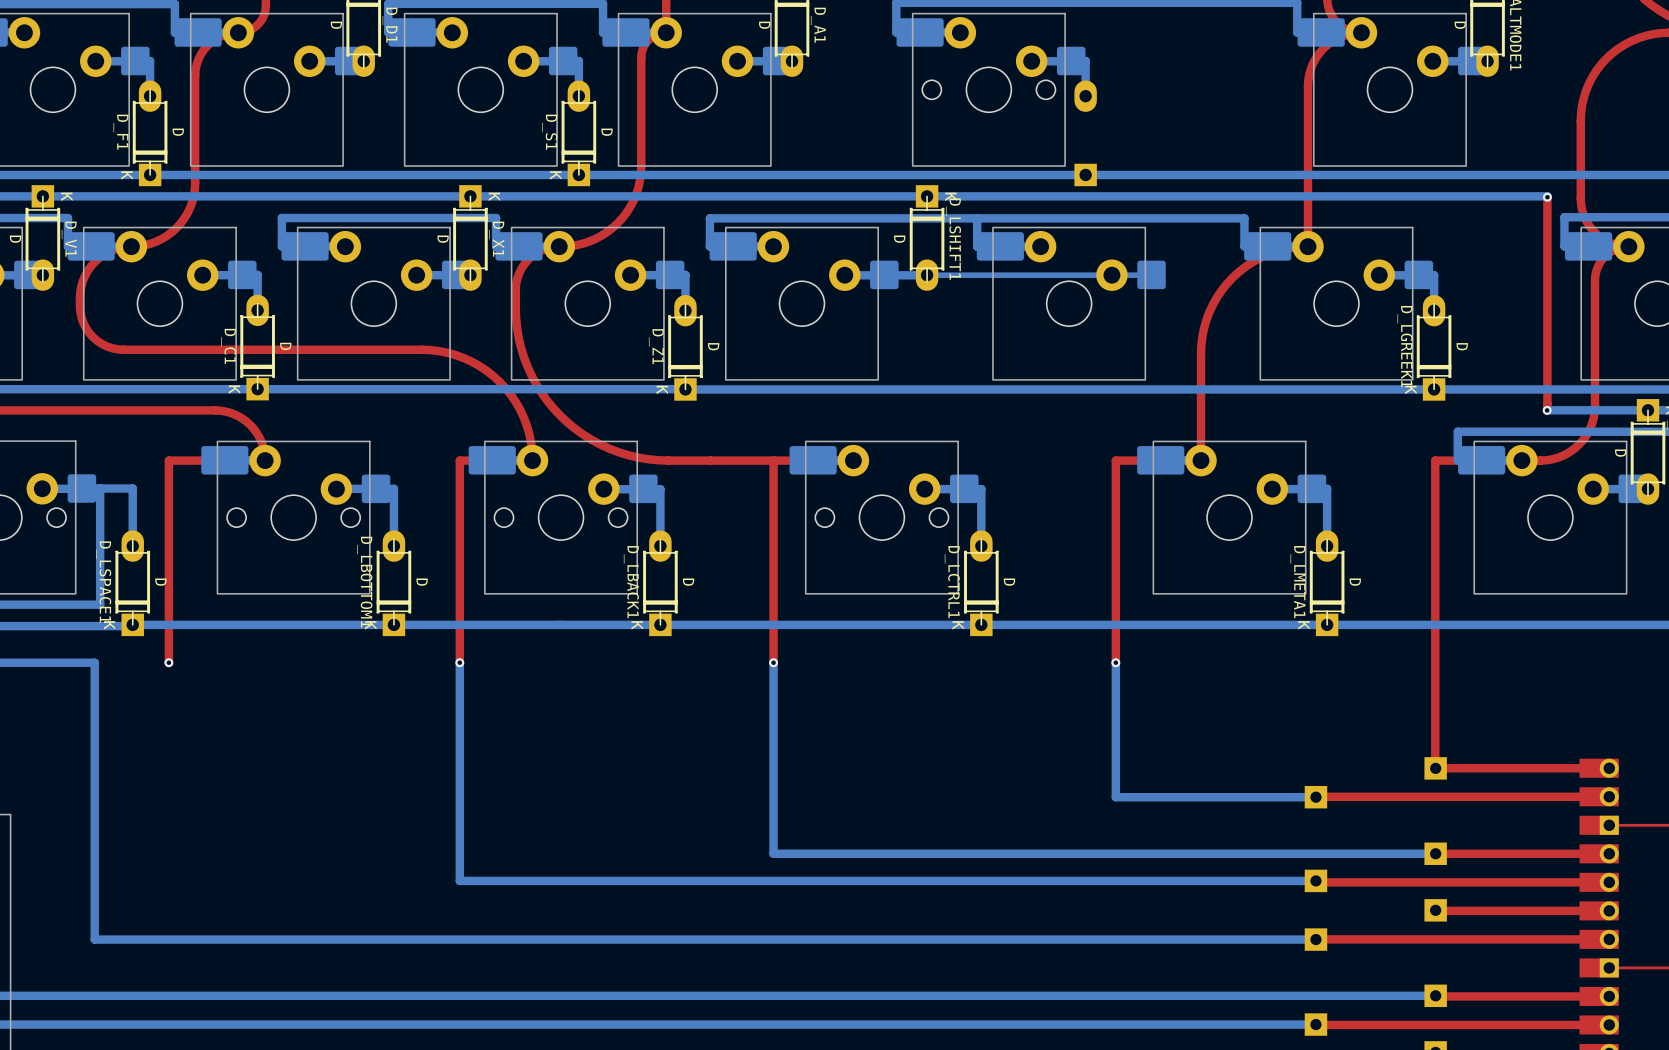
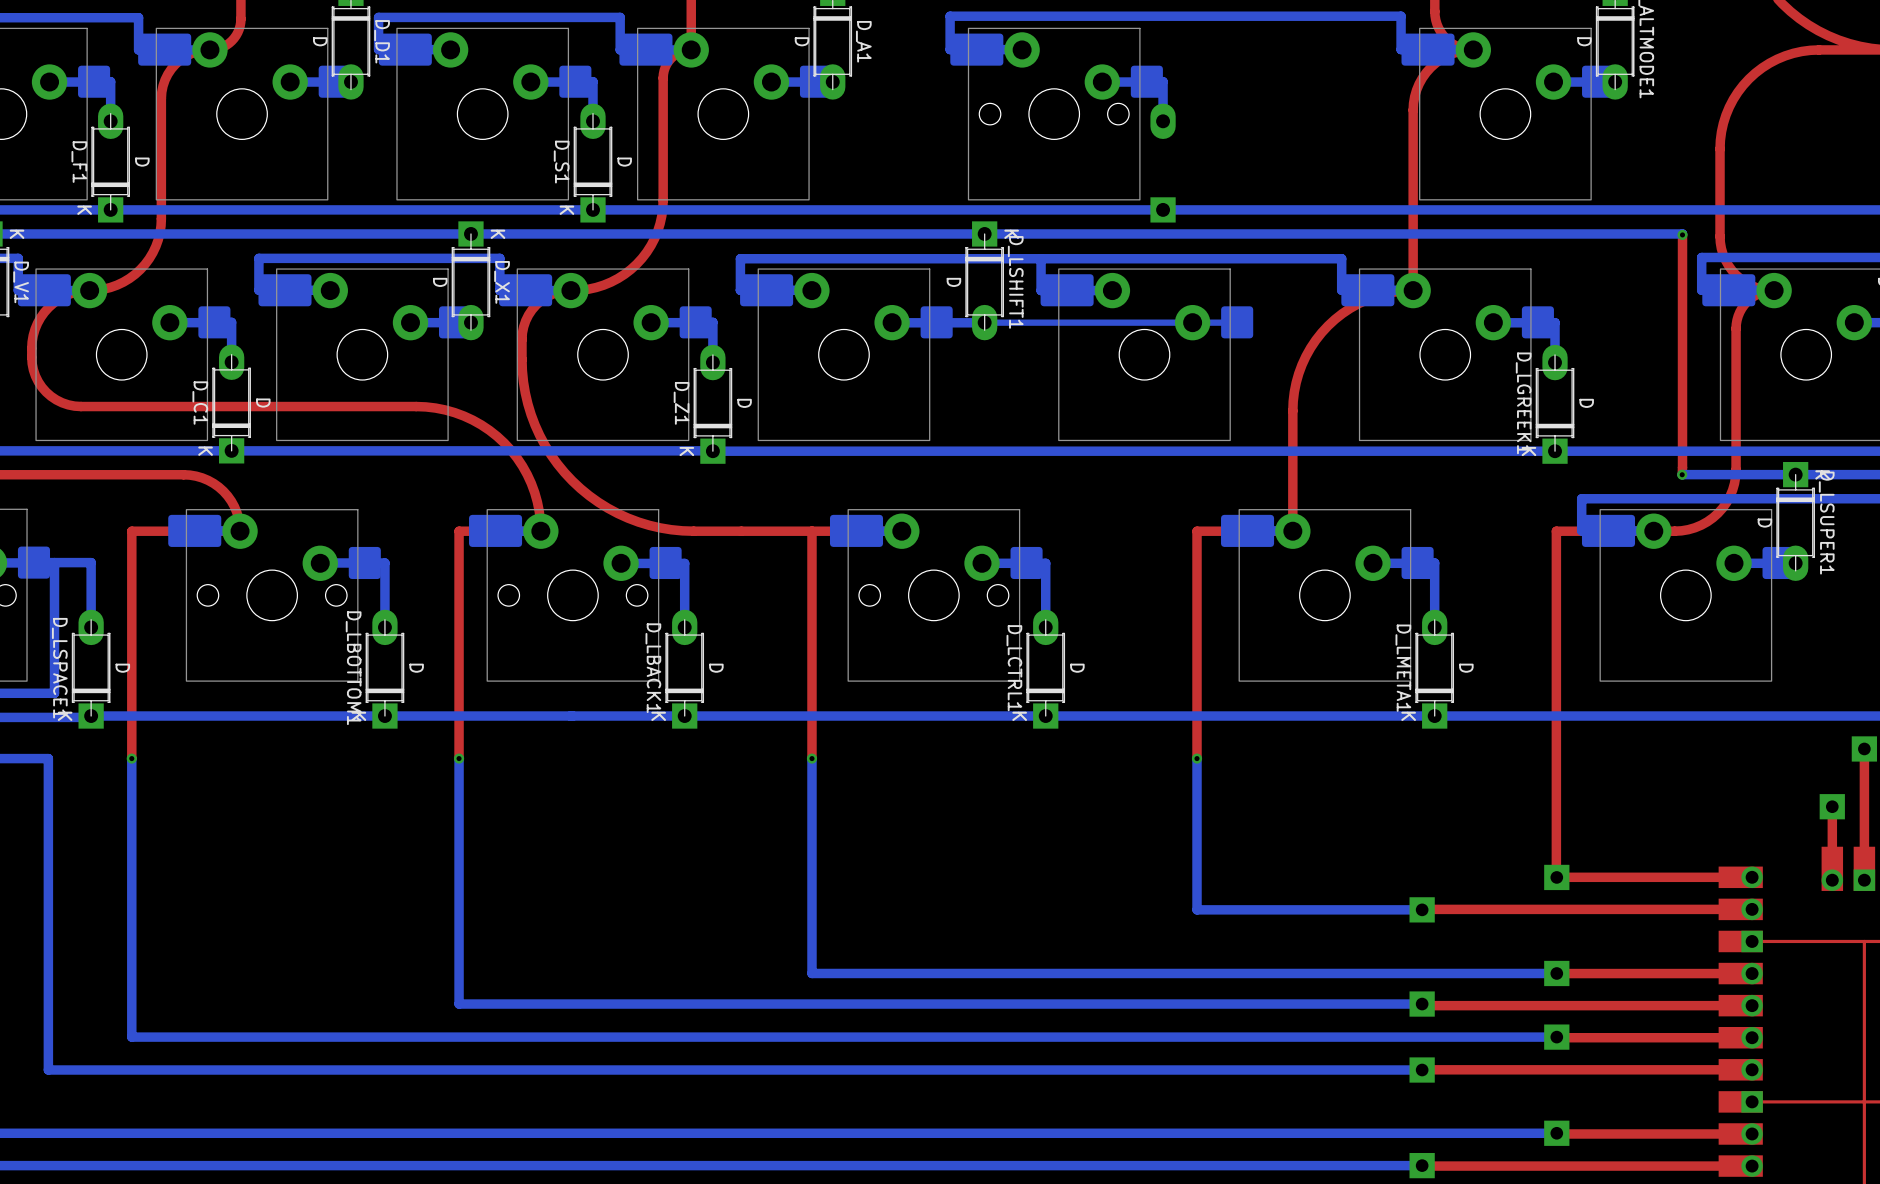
bottom track: none -> (131, 758) (131, 1037) (1556, 1037)

